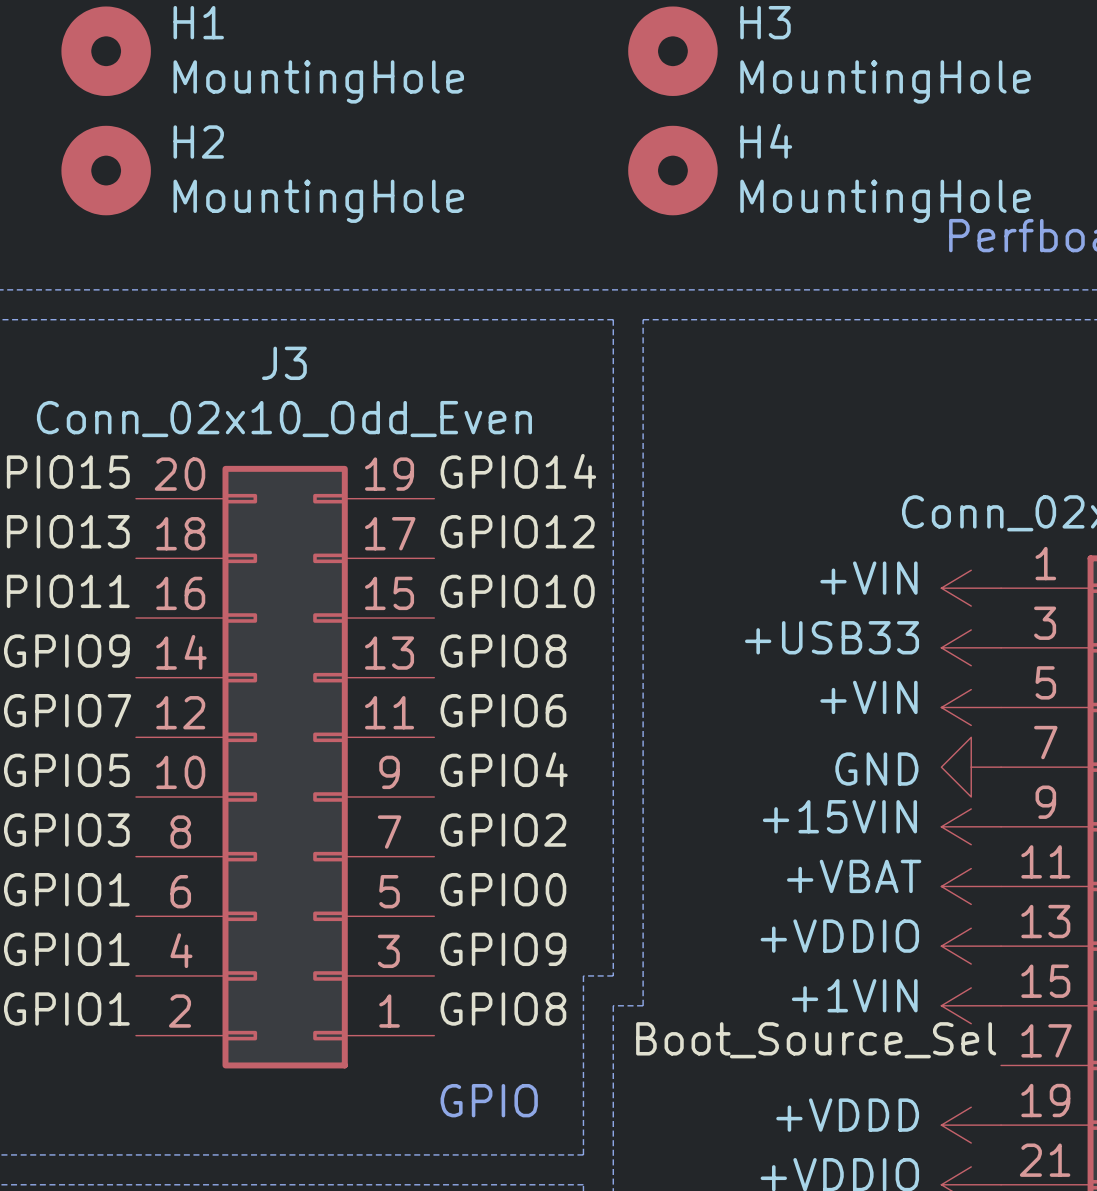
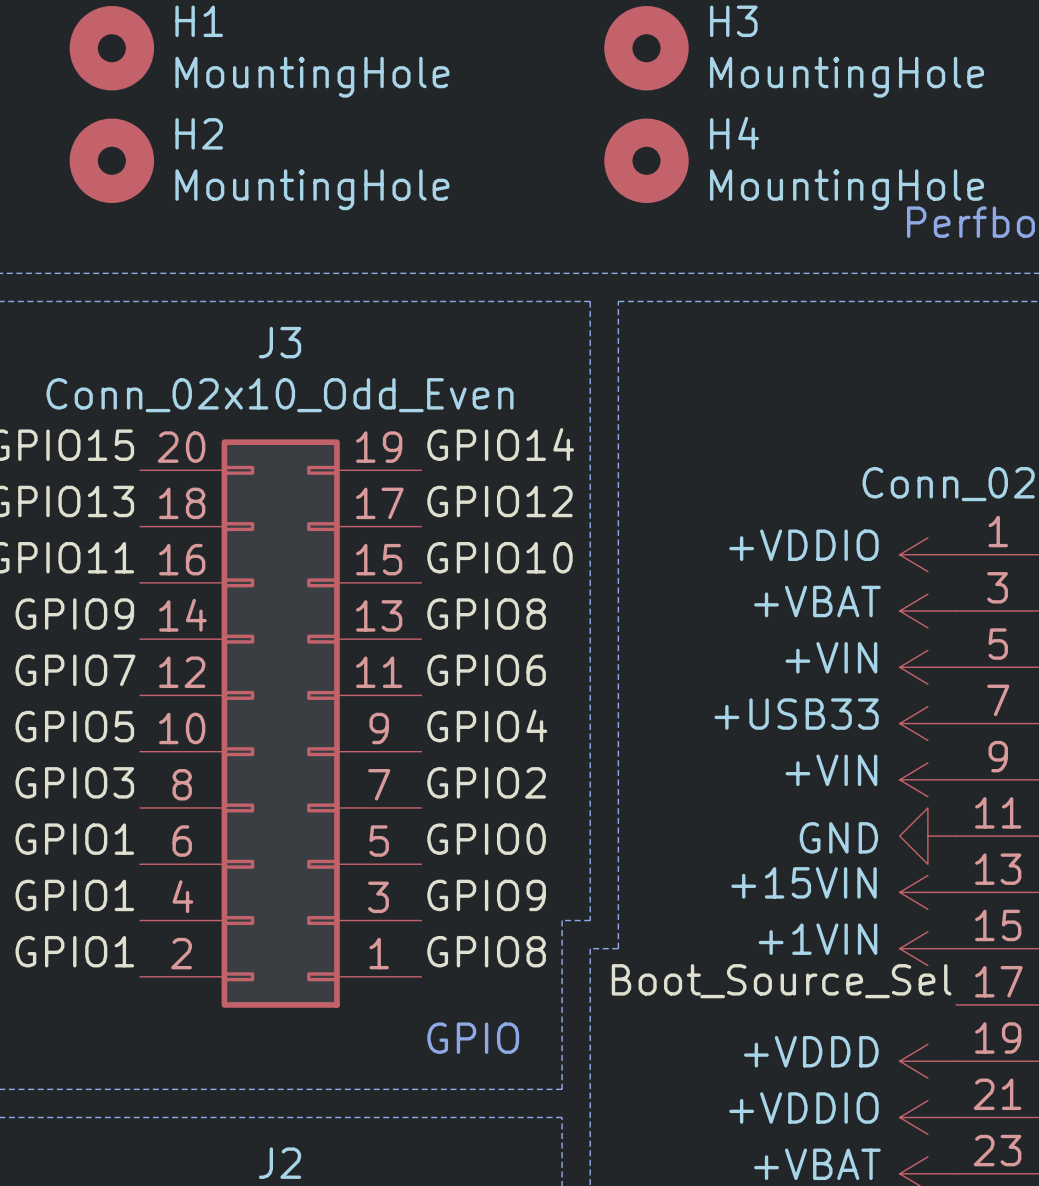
power symbol: +VIN (971, 588) -> +VDDIO (927, 554)
power symbol: +USB33 (971, 647) -> +VBAT (927, 611)
power symbol: GND (971, 767) -> +USB33 (927, 723)
power symbol: +15VIN (971, 826) -> +VIN (927, 779)
power symbol: +VBAT (971, 886) -> GND (927, 836)
power symbol: +VDDIO (971, 946) -> +15VIN (927, 892)

